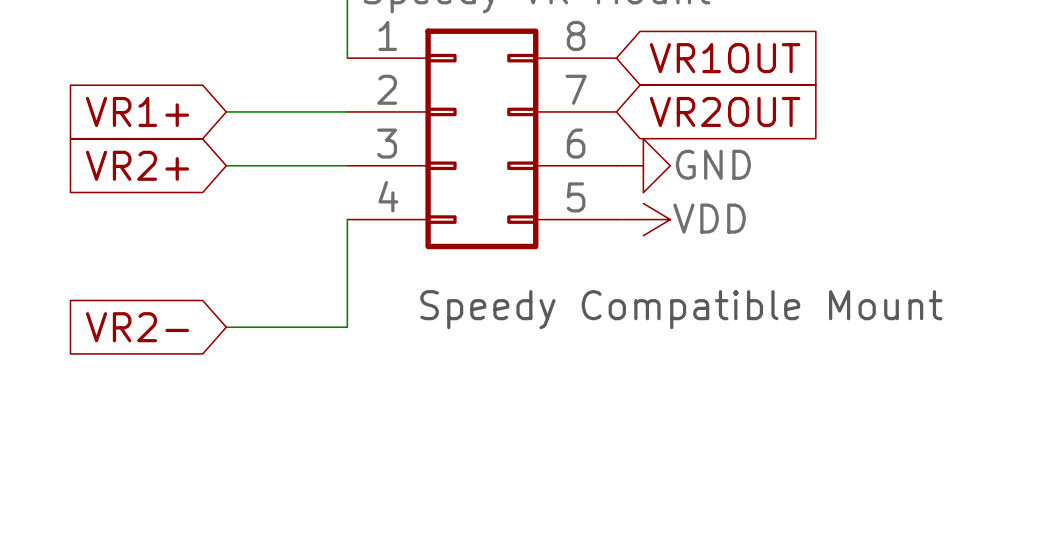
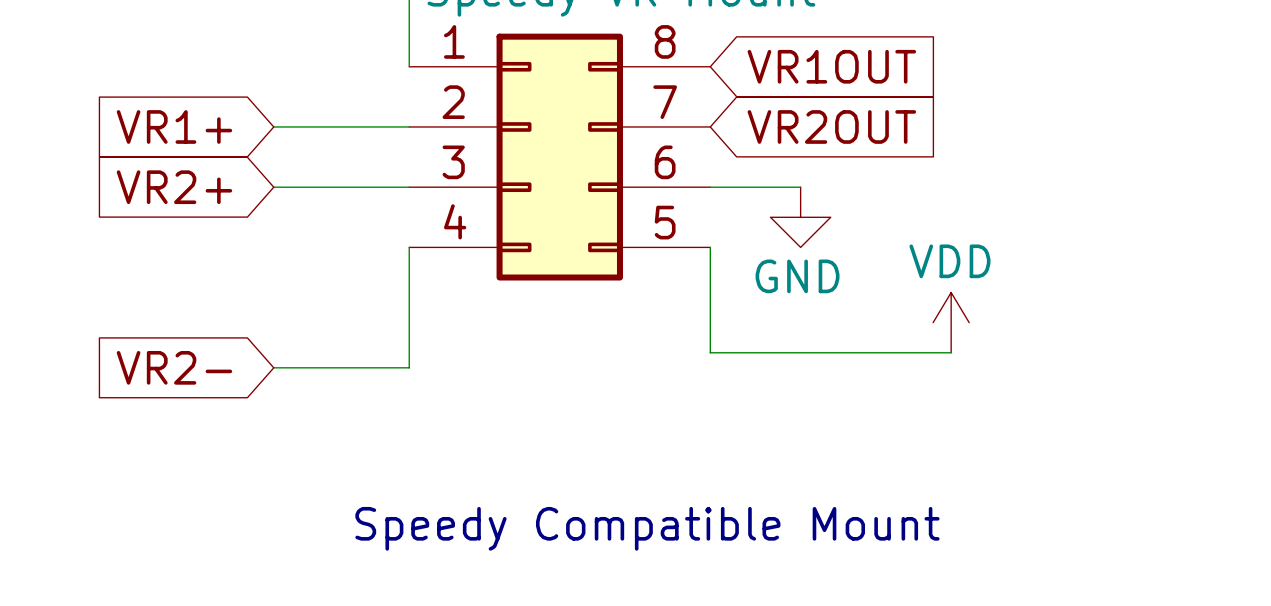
wire: none -> (710, 187) (800, 187)
power symbol rotation: 0° (643, 165) -> 90° clockwise (800, 217)
power symbol position: GND (643, 165) -> GND (800, 217)
wire: none -> (710, 247) (710, 352) (951, 352)
power symbol rotation: 0° (643, 219) -> 90° counterclockwise (951, 322)
power symbol position: VDD (643, 219) -> VDD (951, 322)
text position: Speedy Compatible Mount (681, 309) -> Speedy Compatible Mount (647, 528)

